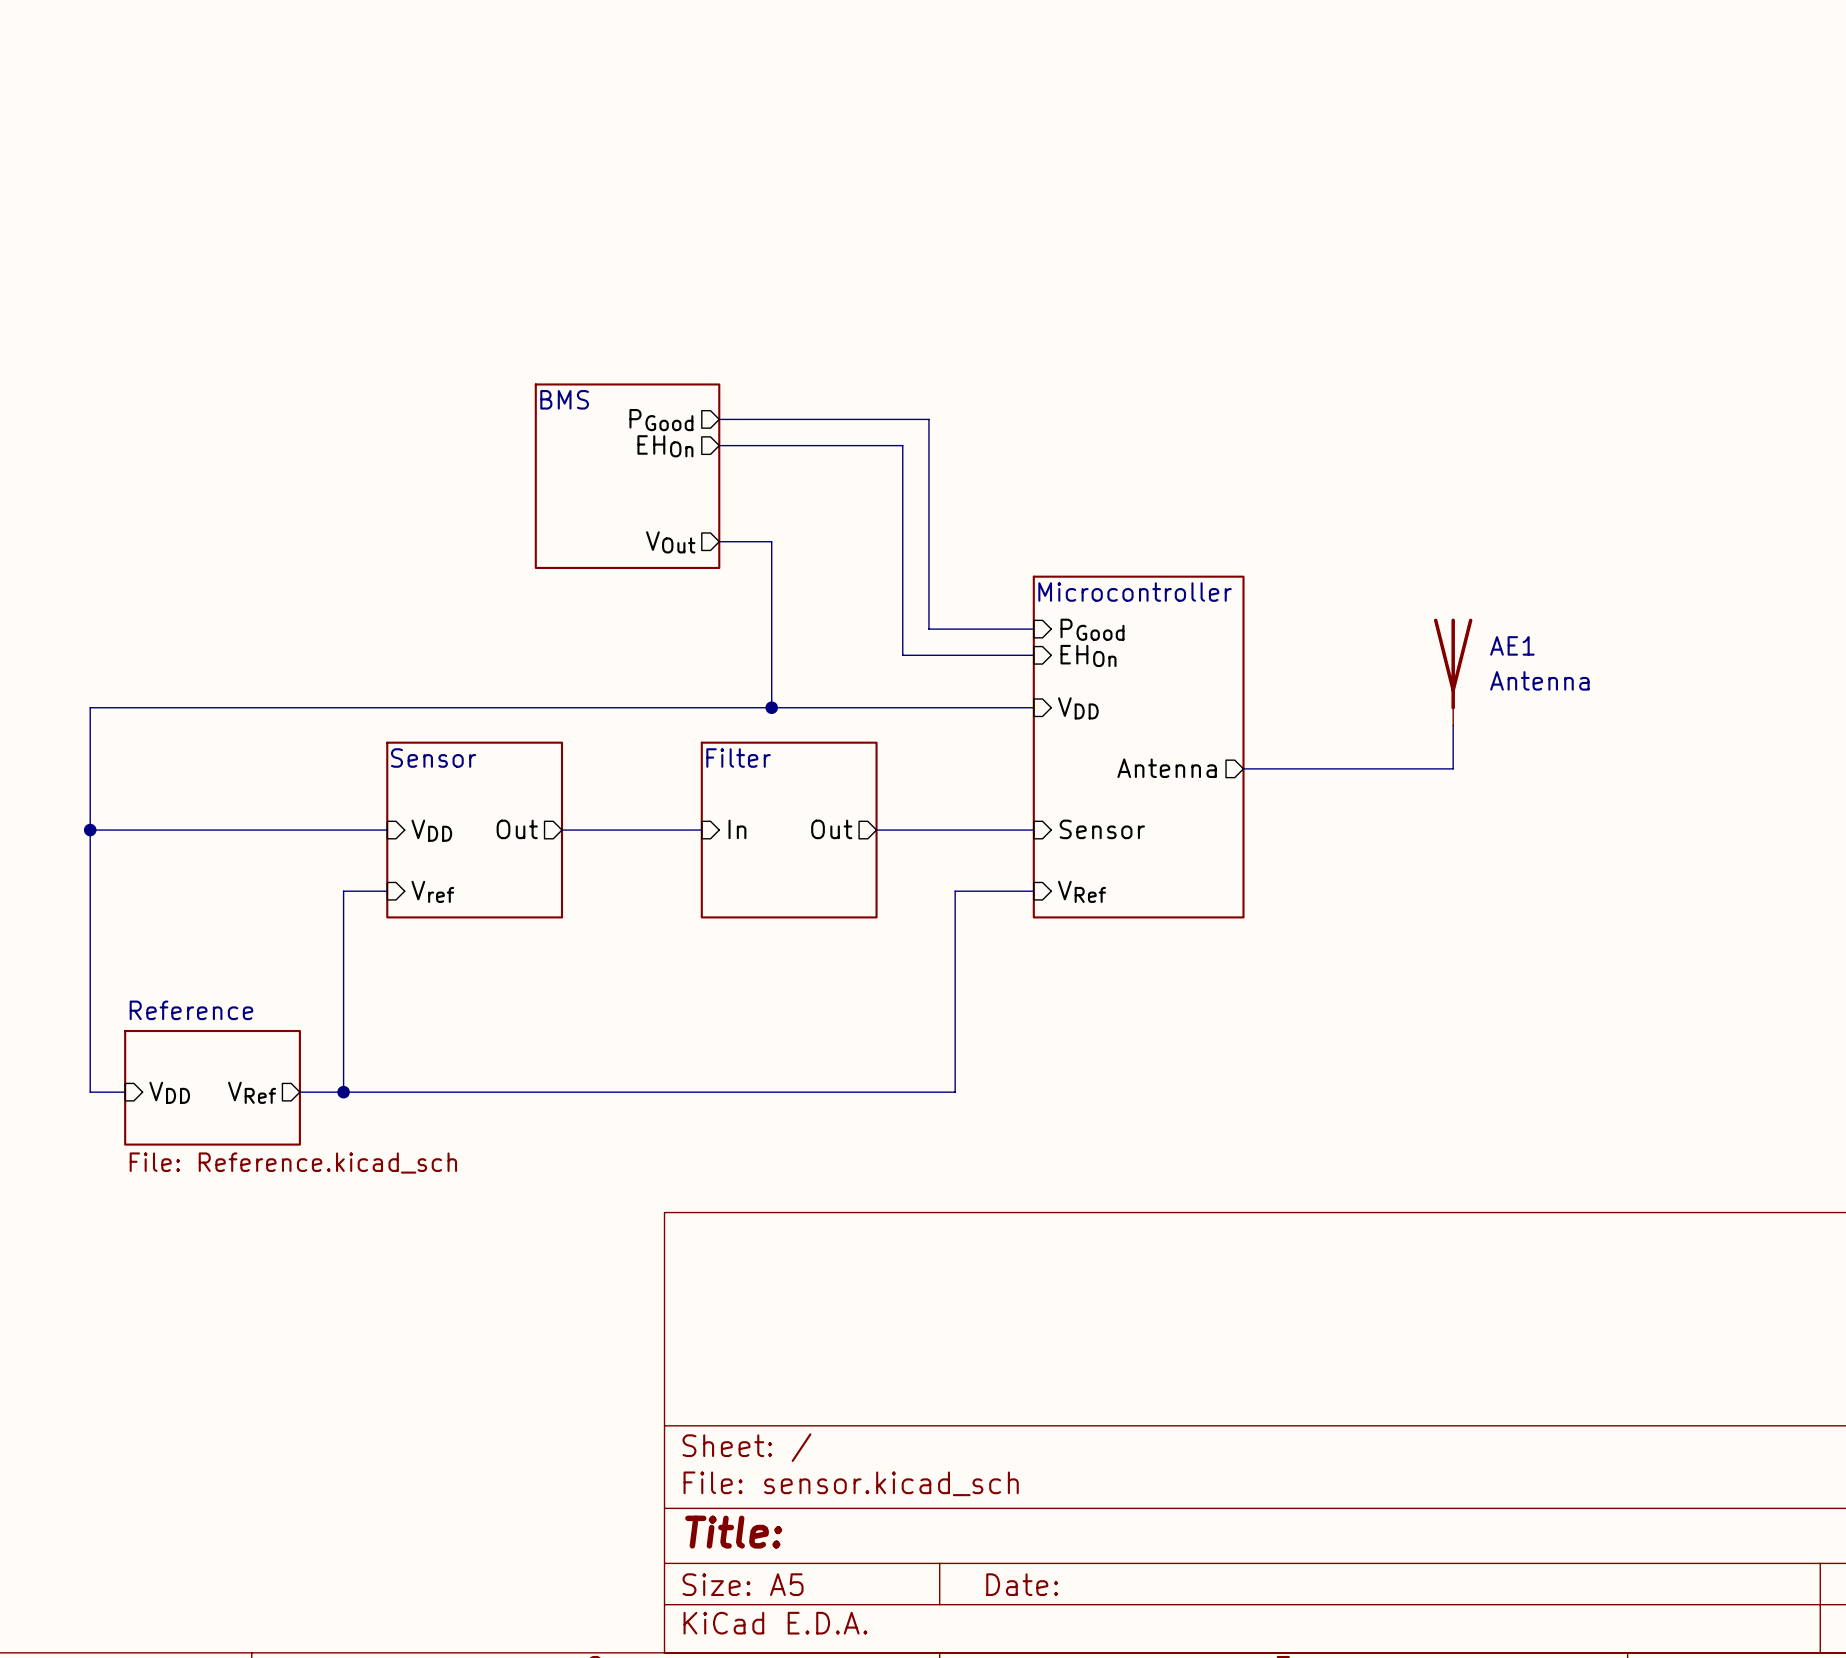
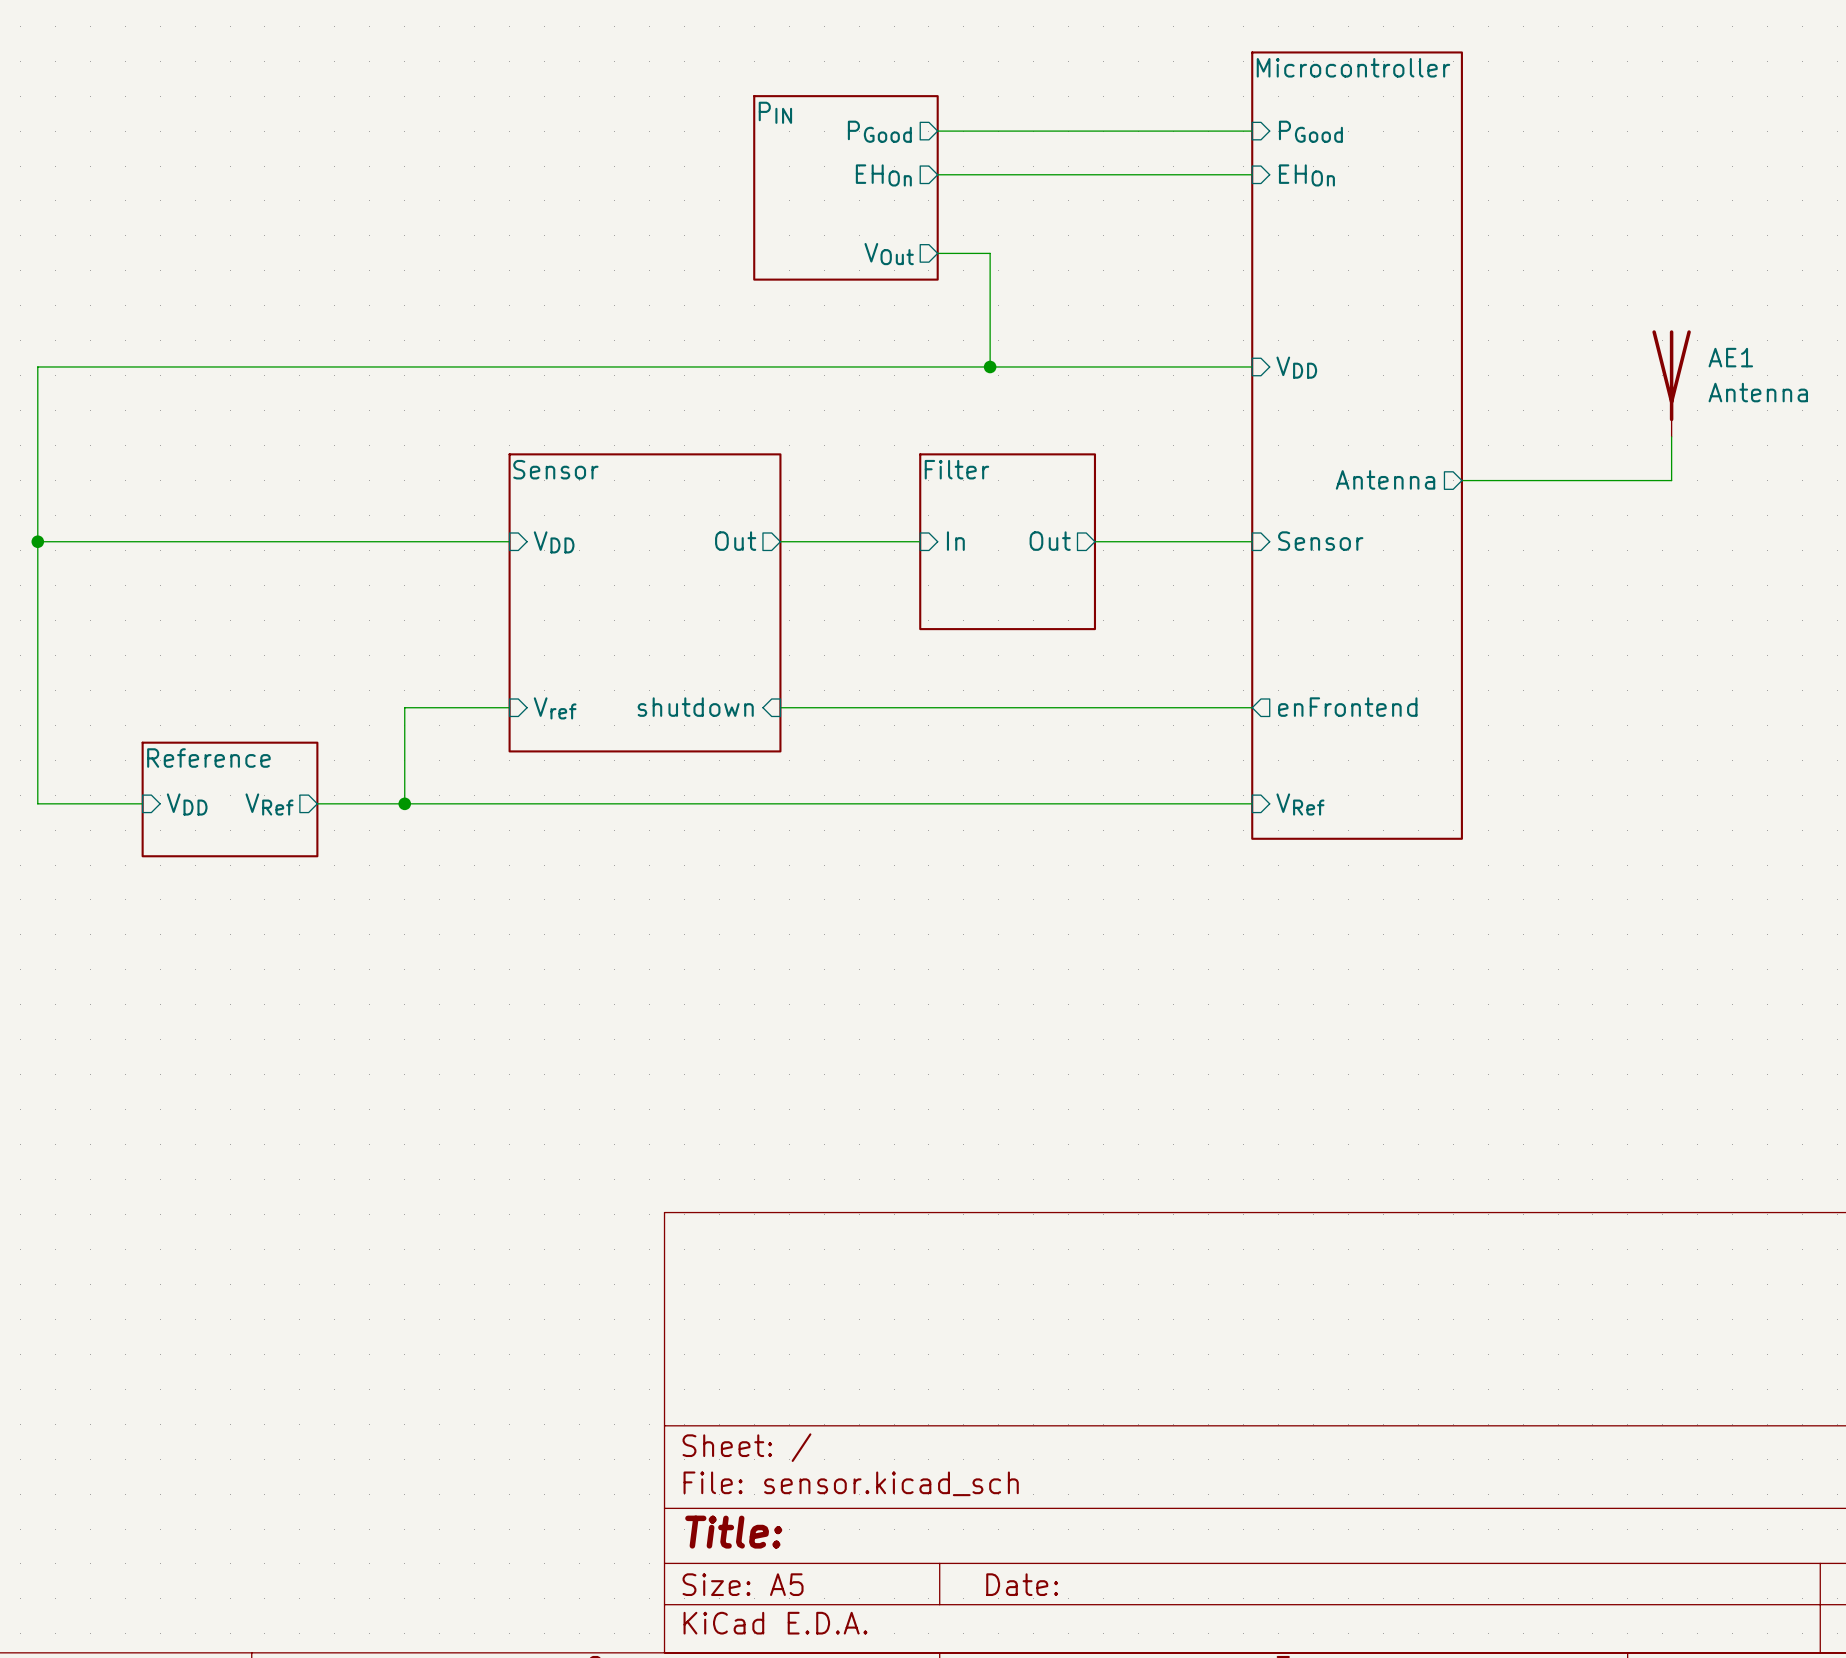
sheet pin: none -> PGood (879, 131)
wire: none -> (937, 131) (1252, 131)
sheet pin: none -> PGood (1310, 131)
wire: none -> (937, 174) (1252, 174)
sheet pin: none -> EHOn (883, 175)
sheet pin: none -> EHOn (1306, 175)
sheet PIN: none -> (845, 187)
wire: none -> (937, 253) (990, 253) (990, 366)
sheet pin: none -> VOut (889, 254)
junction: none -> (990, 366)
wire: none -> (1252, 366) (37, 366) (37, 803) (142, 803)
sheet pin: none -> VDD (1296, 367)
wire: (719, 419) (928, 419) (928, 629) (1033, 629) -> none
sheet pin: PGood (661, 420) -> none
wire: none -> (1671, 436) (1671, 480) (1461, 480)
wire: (719, 445) (902, 445) (902, 655) (1033, 655) -> none
sheet Microcontroller: none -> (1357, 445)
sheet pin: EHOn (665, 446) -> none
sheet BMS: (627, 476) -> none
sheet pin: none -> Antenna (1385, 479)
wire: none -> (37, 541) (509, 541)
junction: none -> (37, 541)
wire: (719, 541) (771, 541) (771, 707) -> none
sheet pin: none -> Out (735, 541)
wire: none -> (780, 541) (920, 541)
sheet pin: none -> In (955, 541)
sheet Filter: none -> (1007, 541)
sheet pin: none -> Out (1050, 541)
wire: none -> (1094, 541) (1252, 541)
sheet pin: none -> Sensor (1320, 541)
sheet pin shape: output (670, 542) -> input (554, 542)
sheet pin: VOut (670, 542) -> VDD (554, 542)
sheet Sensor: none -> (645, 602)
sheet pin: PGood (1092, 629) -> none
sheet pin: EHOn (1088, 655) -> none
AE1 position: (1453, 671) -> (1671, 383)
wire: (404, 707) (90, 707) (90, 1092) (125, 1092) -> (404, 707) (404, 803)
wire: (509, 707) (780, 707) -> none
sheet pin: none -> shutdown (695, 707)
junction: (771, 707) -> none
wire: none -> (1033, 707) (1252, 707)
sheet pin: none -> enFrontend (1347, 707)
sheet pin: VDD (1078, 708) -> none
wire: (1453, 725) (1453, 768) (1243, 768) -> none
sheet Microcontroller: (1138, 747) -> none
sheet pin: Antenna (1167, 768) -> none
sheet Reference: none -> (230, 799)
wire: none -> (317, 803) (1252, 803)
junction: none -> (404, 803)
sheet pin: none -> VDD (187, 804)
sheet pin: Out (517, 829) -> none
sheet pin: In (737, 829) -> none
sheet pin: Out (831, 829) -> none
sheet pin: Sensor (1102, 829) -> none
wire: (90, 830) (387, 830) -> none
junction: (90, 830) -> none
sheet pin: VDD (431, 830) -> none
sheet Sensor: (474, 830) -> none
wire: (562, 830) (701, 830) -> none
sheet Filter: (789, 830) -> none
wire: (876, 830) (1033, 830) -> none
wire: (387, 891) (343, 891) (343, 1092) -> none
sheet pin position: Vref (432, 891) -> Vref (555, 708)
wire: (1033, 891) (955, 891) (955, 1092) (299, 1092) -> none
sheet pin position: VRef (1082, 891) -> VRef (1300, 804)
sheet Reference: File: Reference.kicad_sch (212, 1087) -> none
sheet pin: VDD (169, 1092) -> none
sheet pin position: VRef (252, 1092) -> VRef (269, 804)
junction: (343, 1092) -> none

